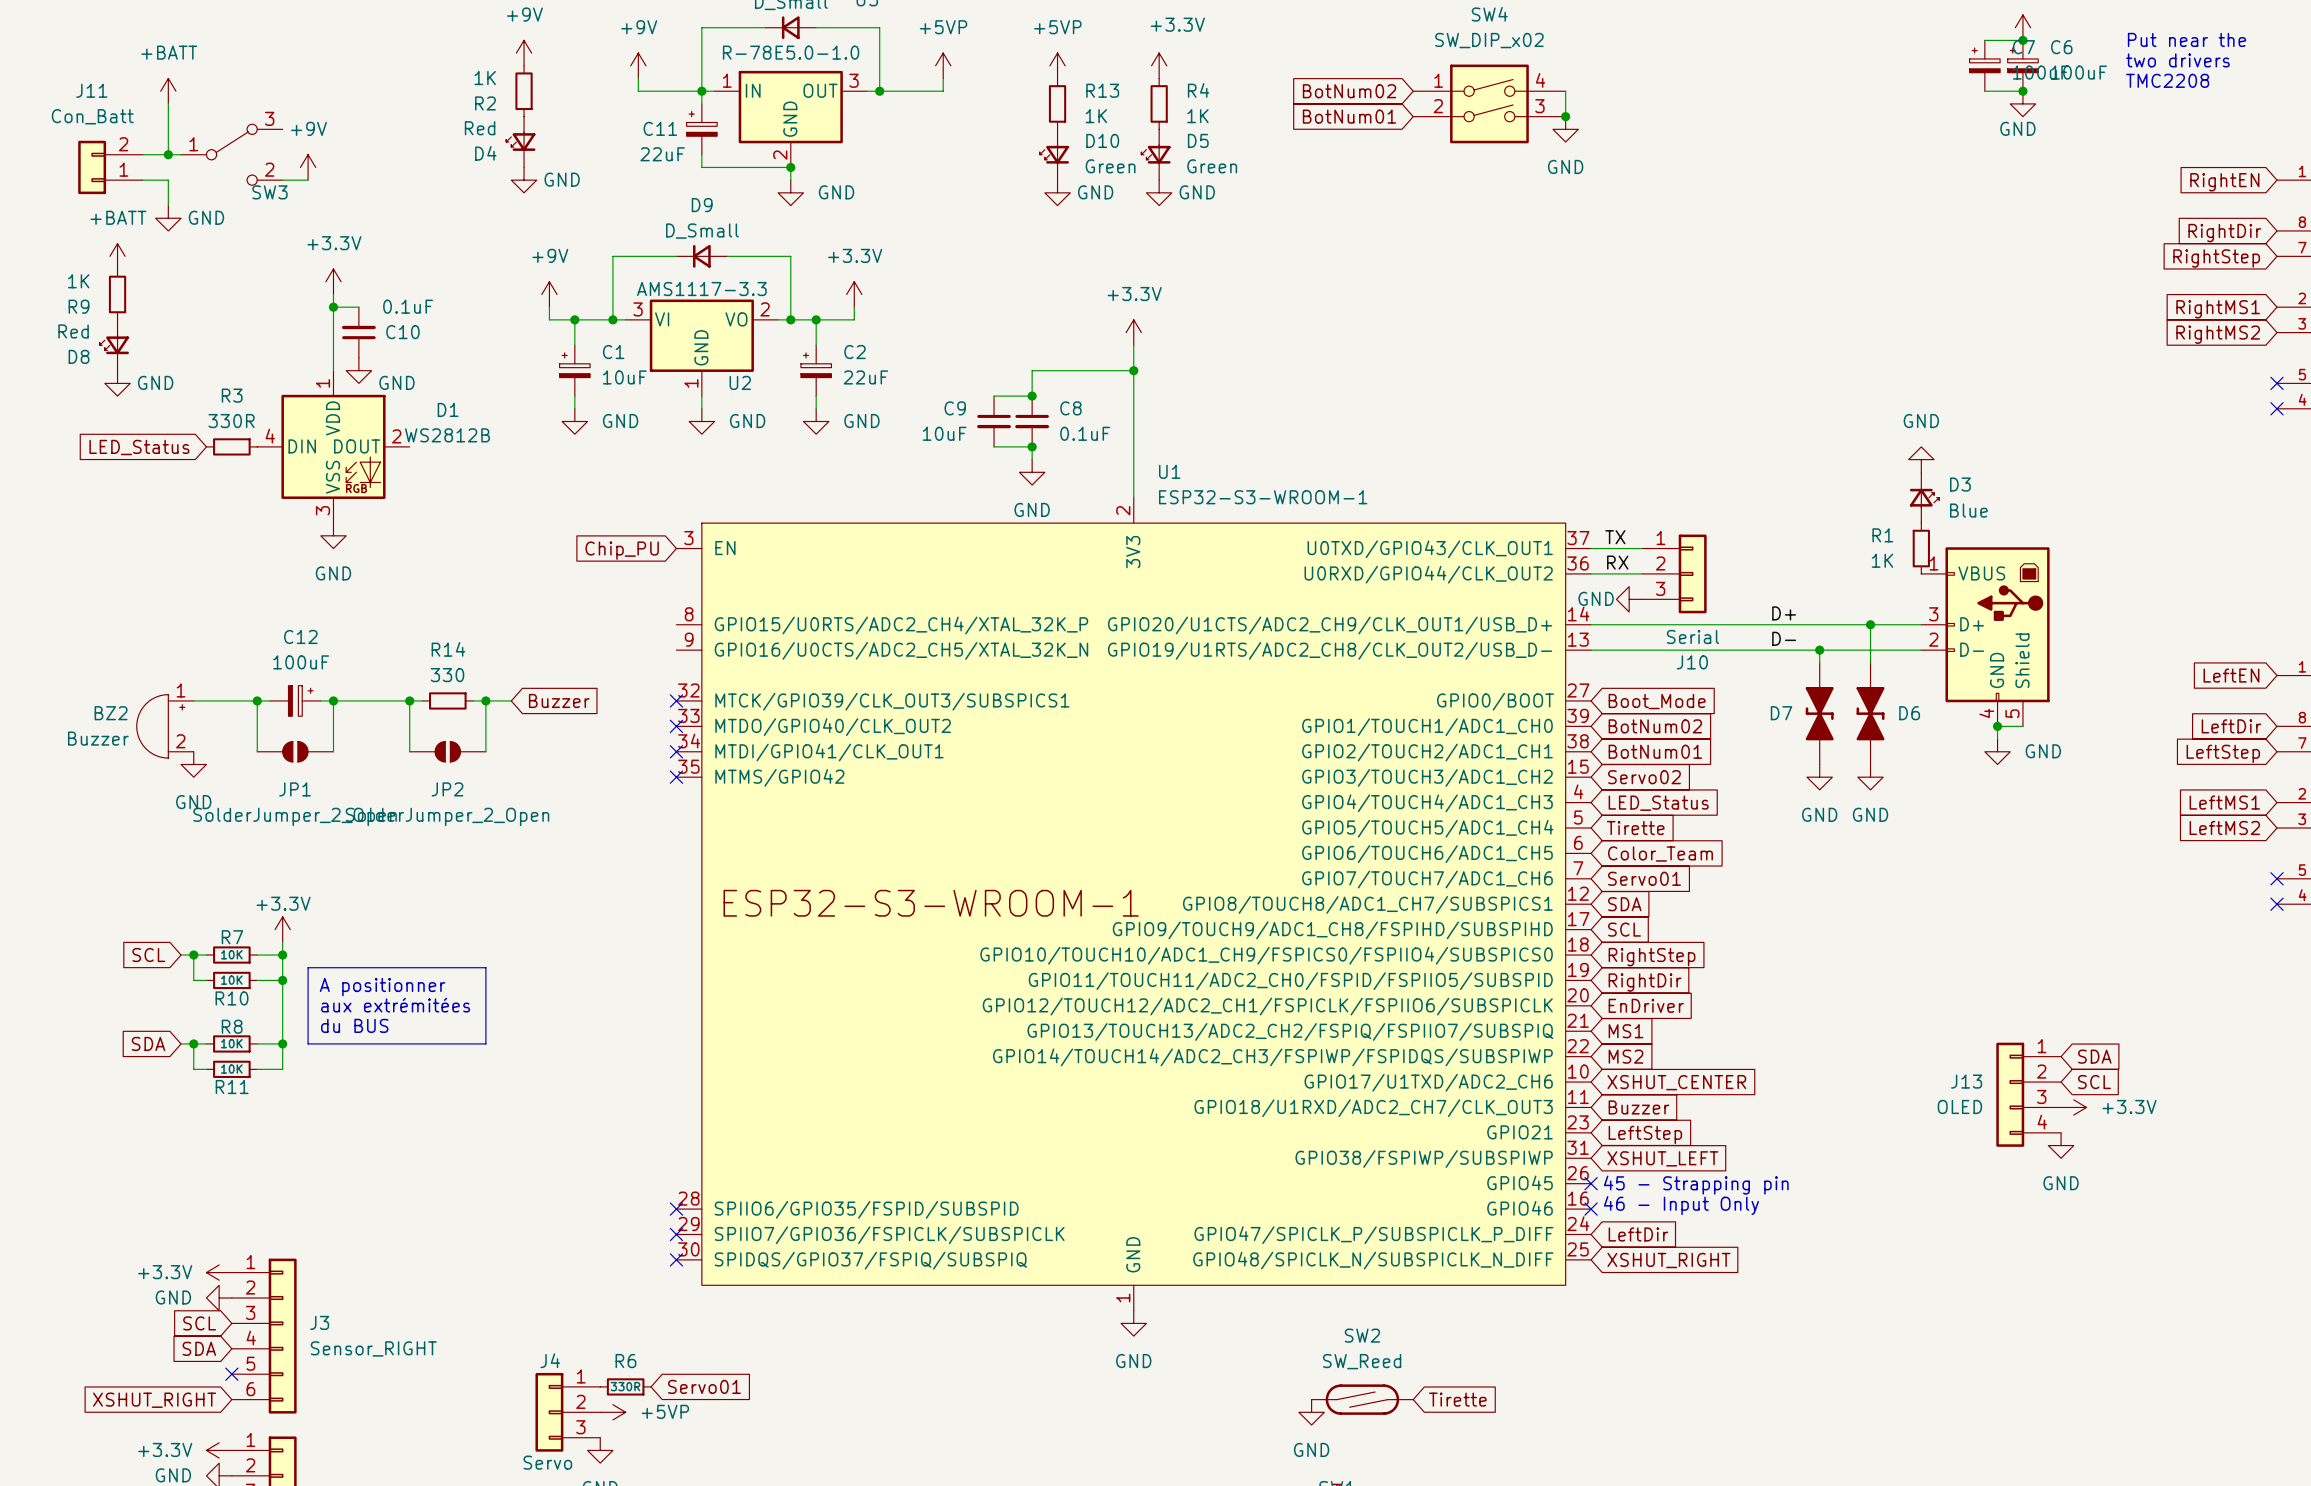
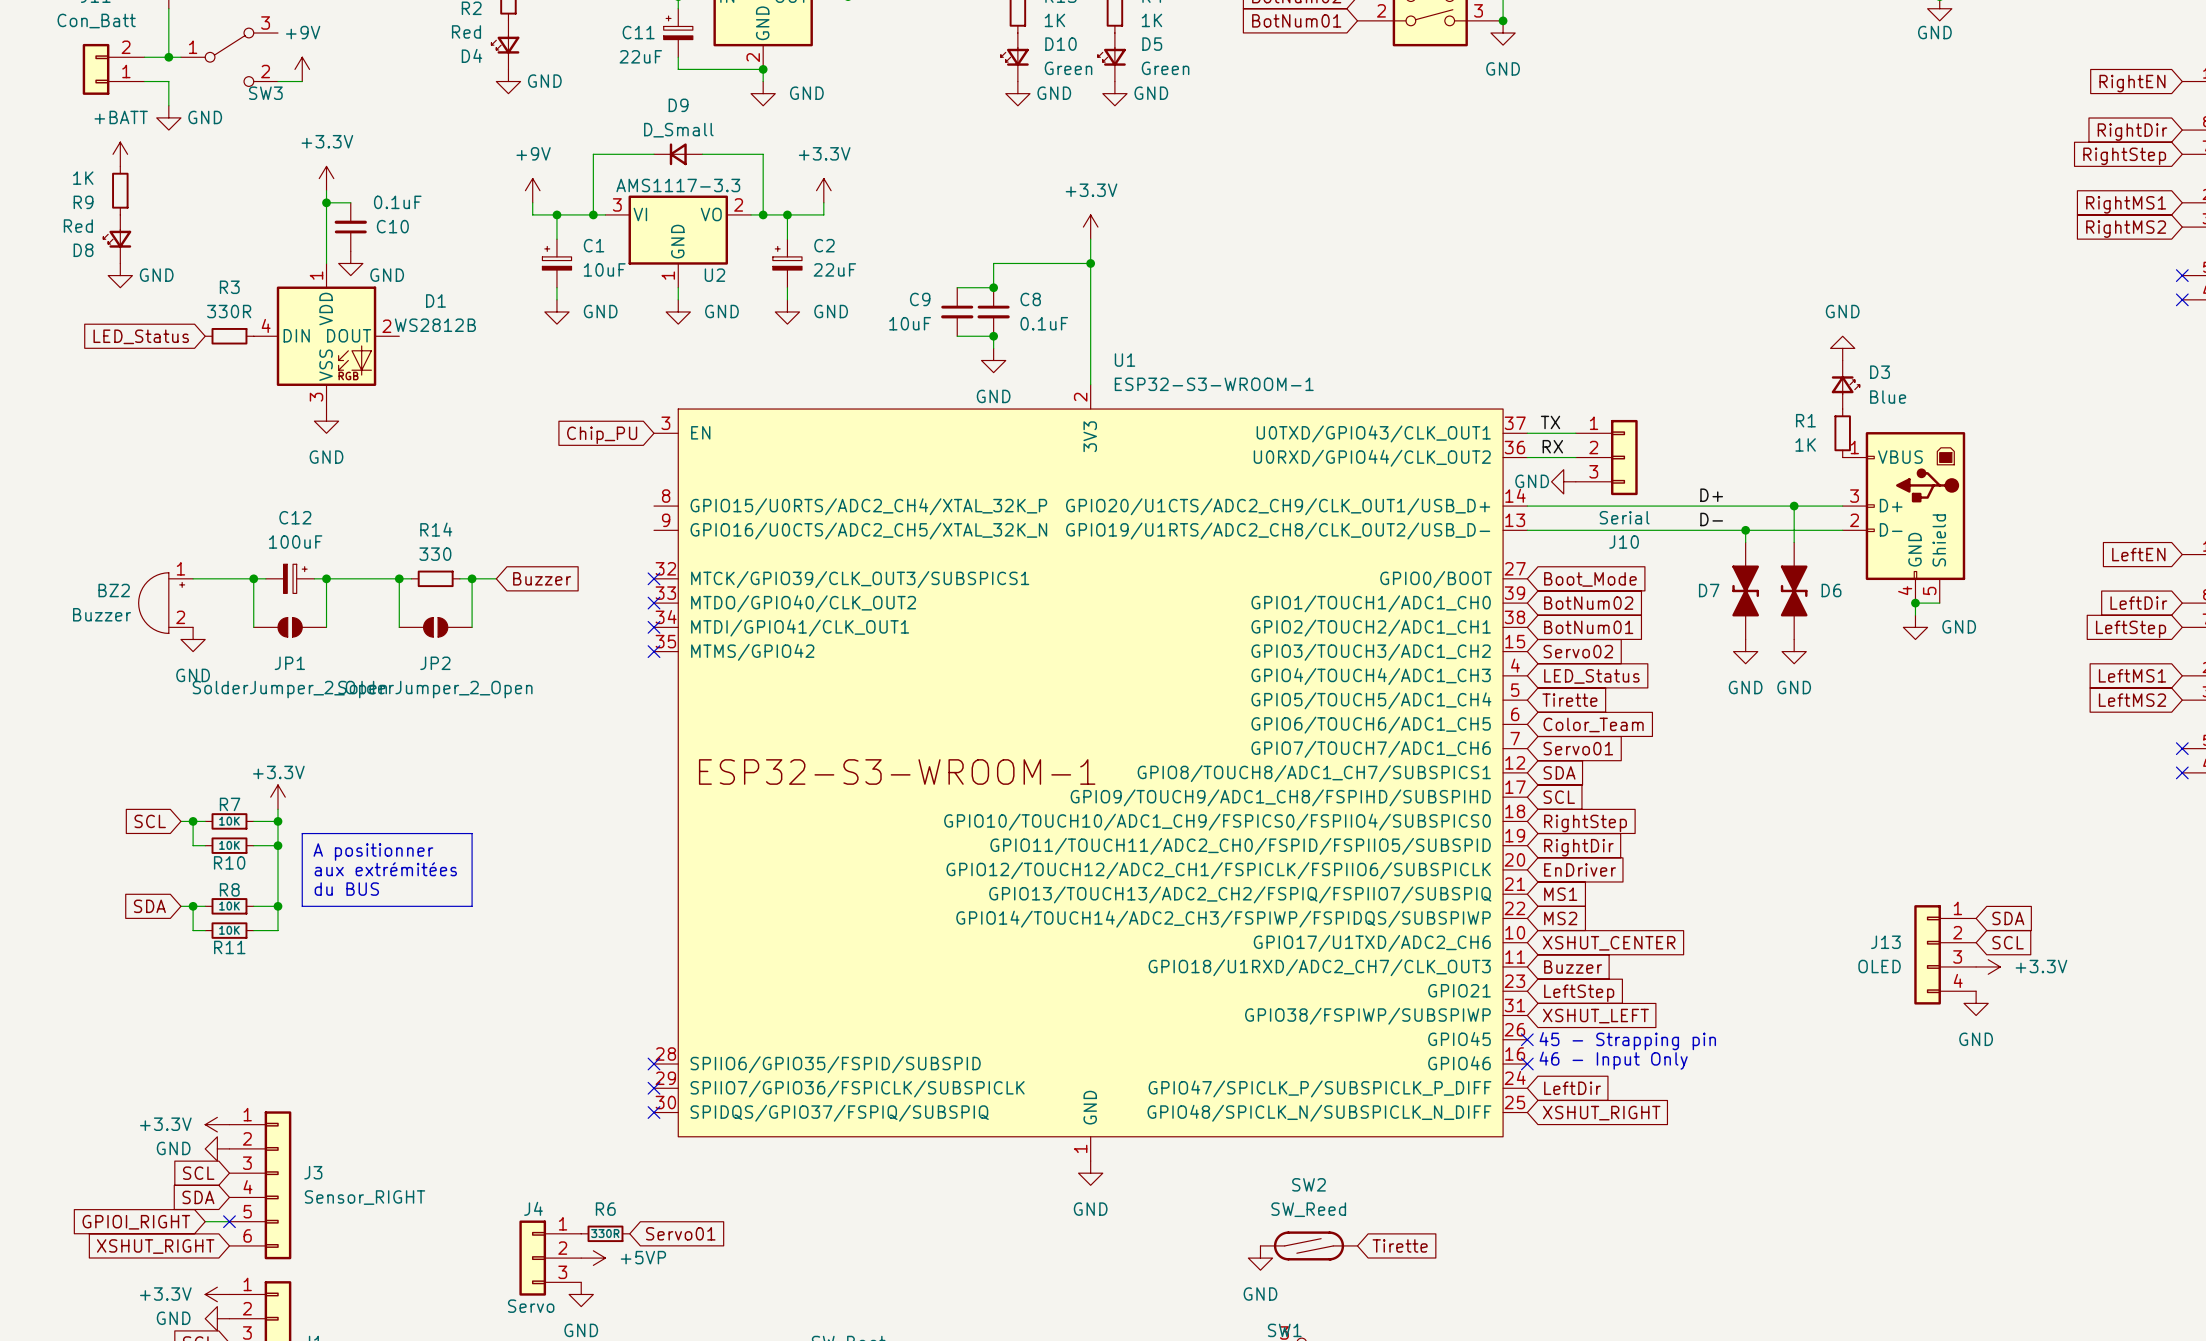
global label: none -> GPIOI_RIGHT (136, 1222)
wire: none -> (205, 1221) (229, 1221)

